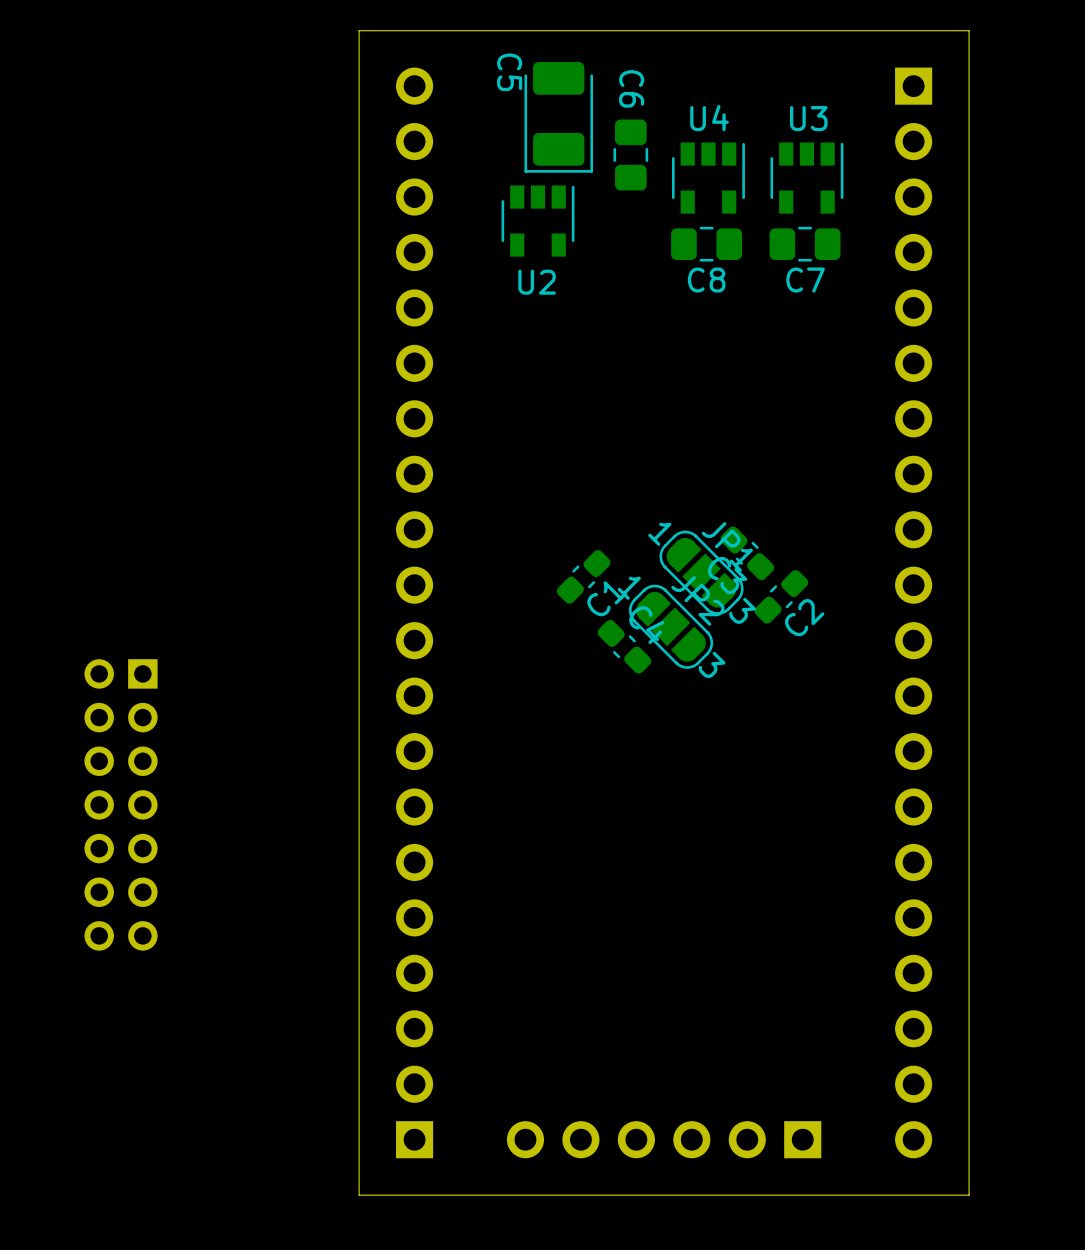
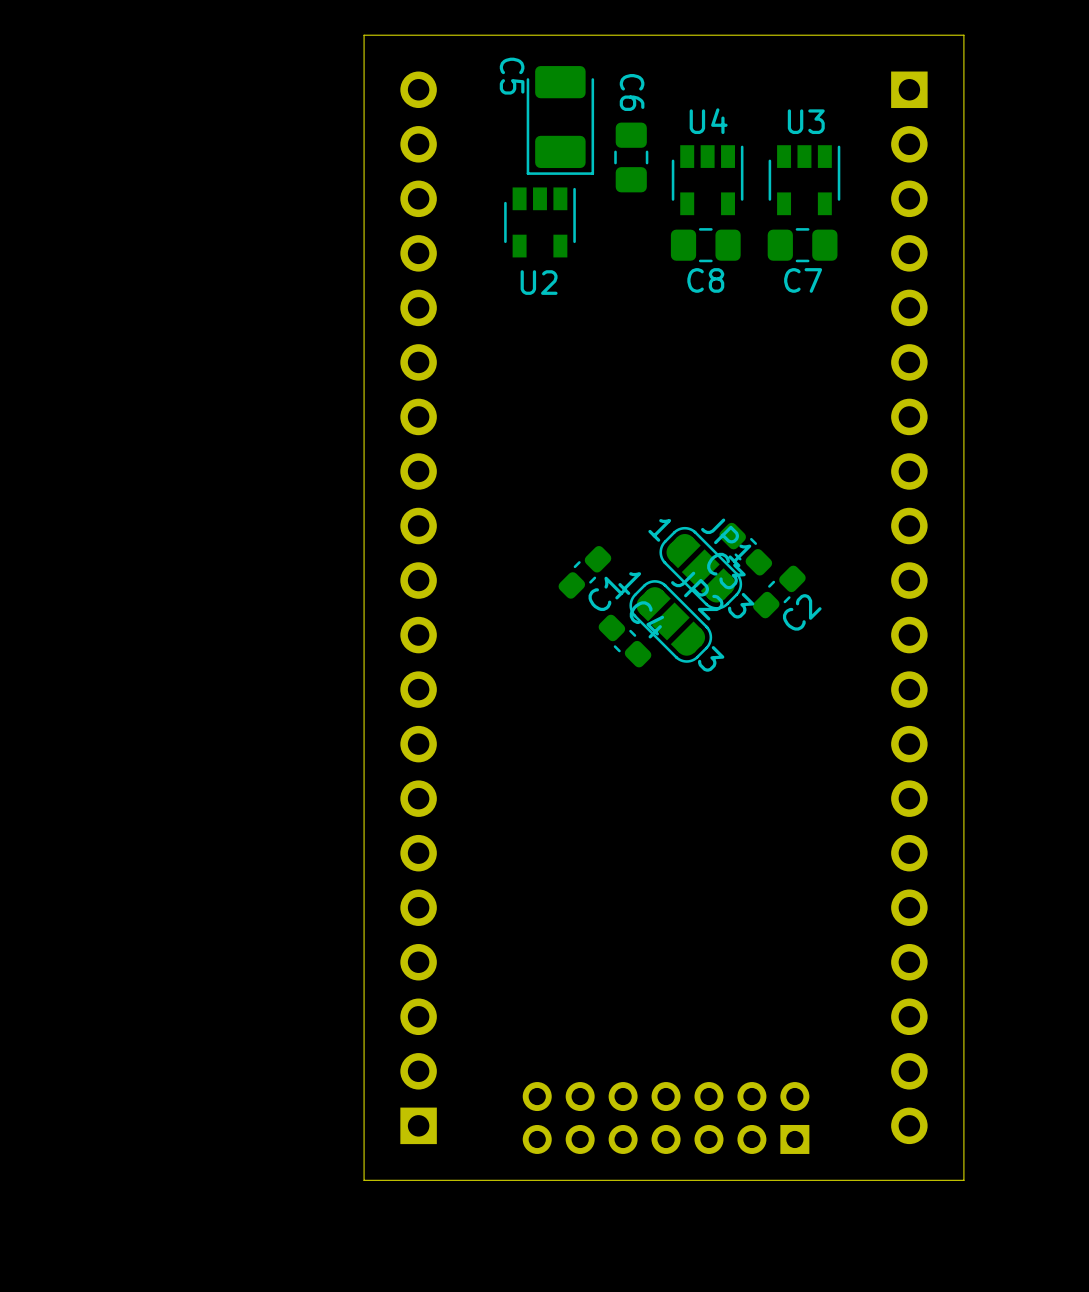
part: (121, 804) -> none
part footprint: [506, 1121, 822, 1159] -> [522, 1082, 810, 1154]

